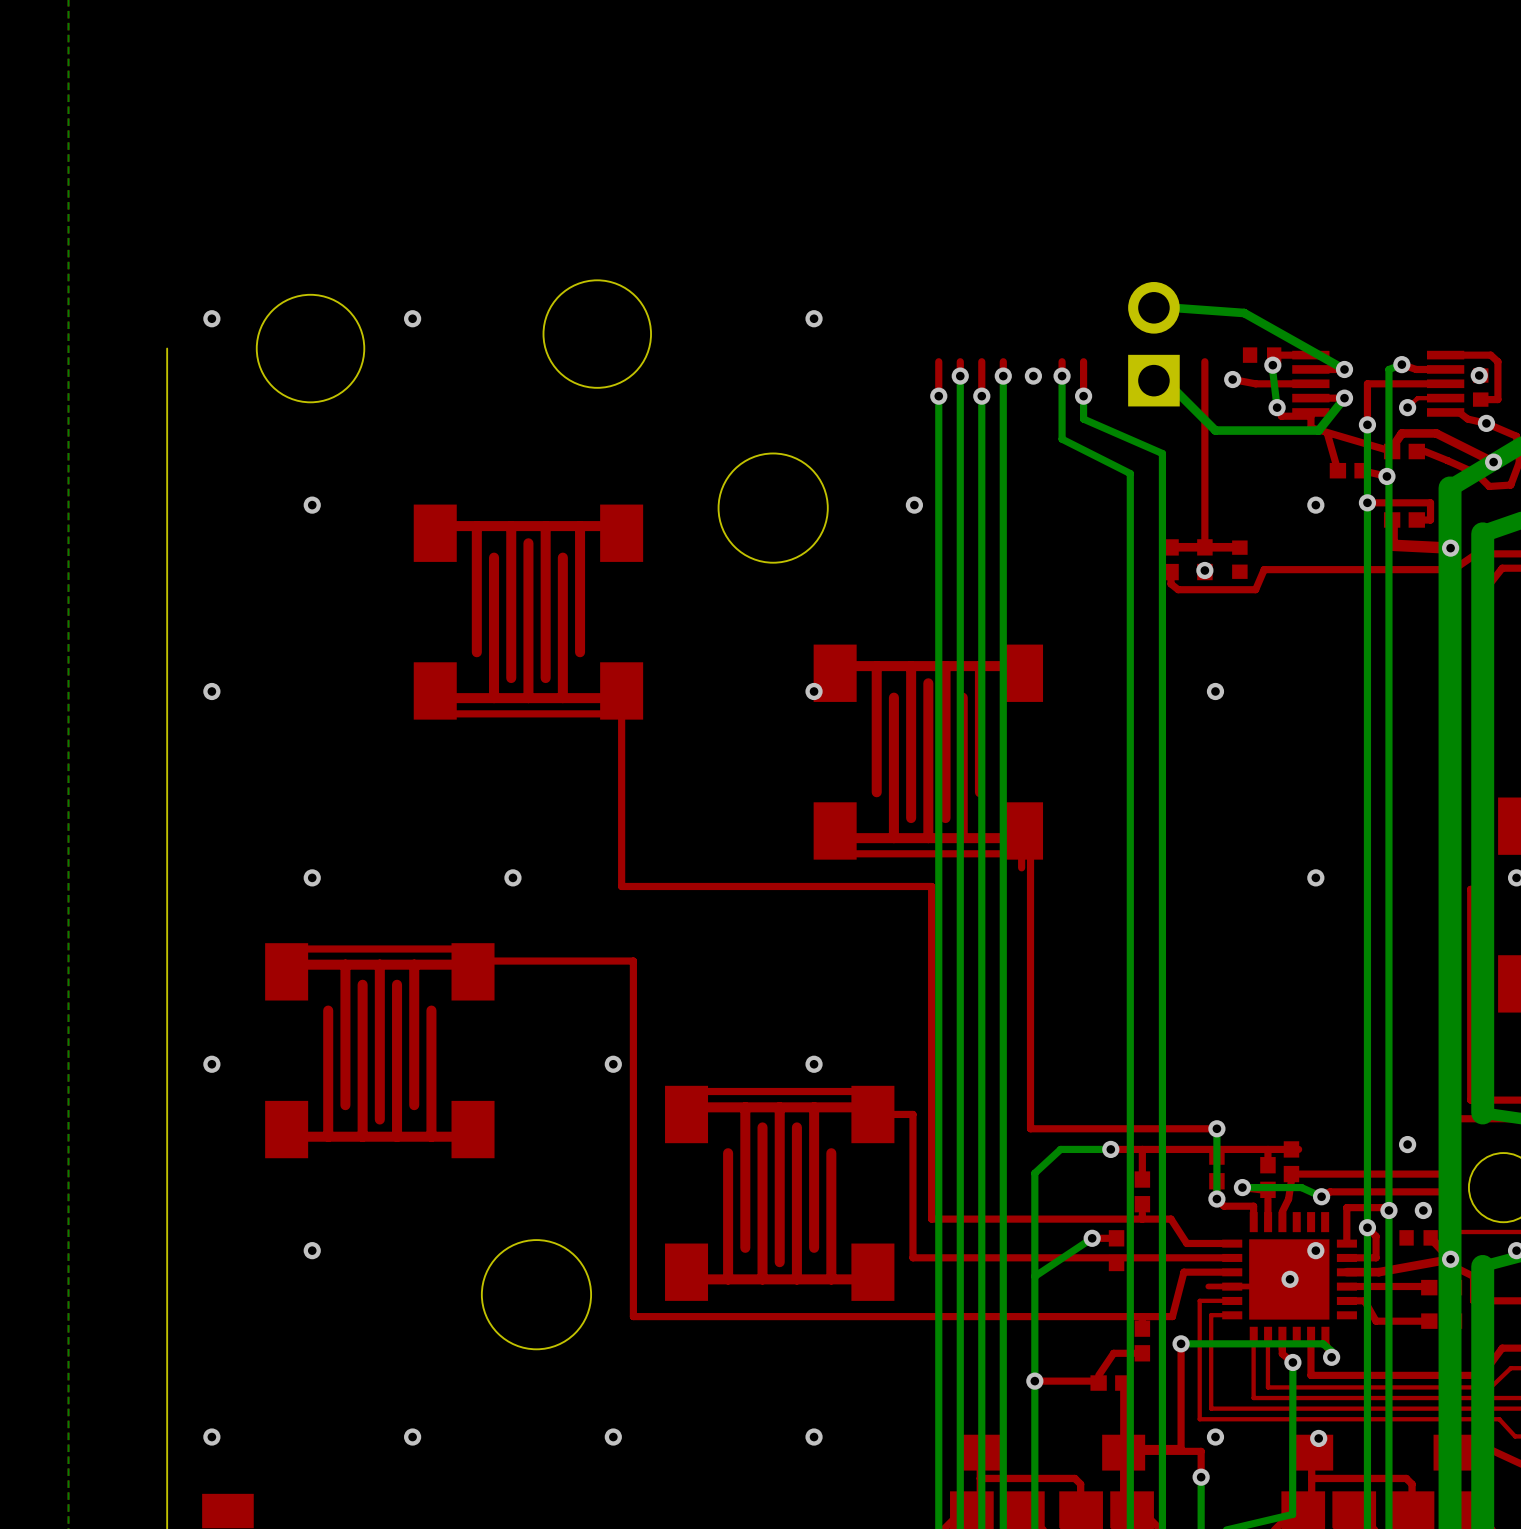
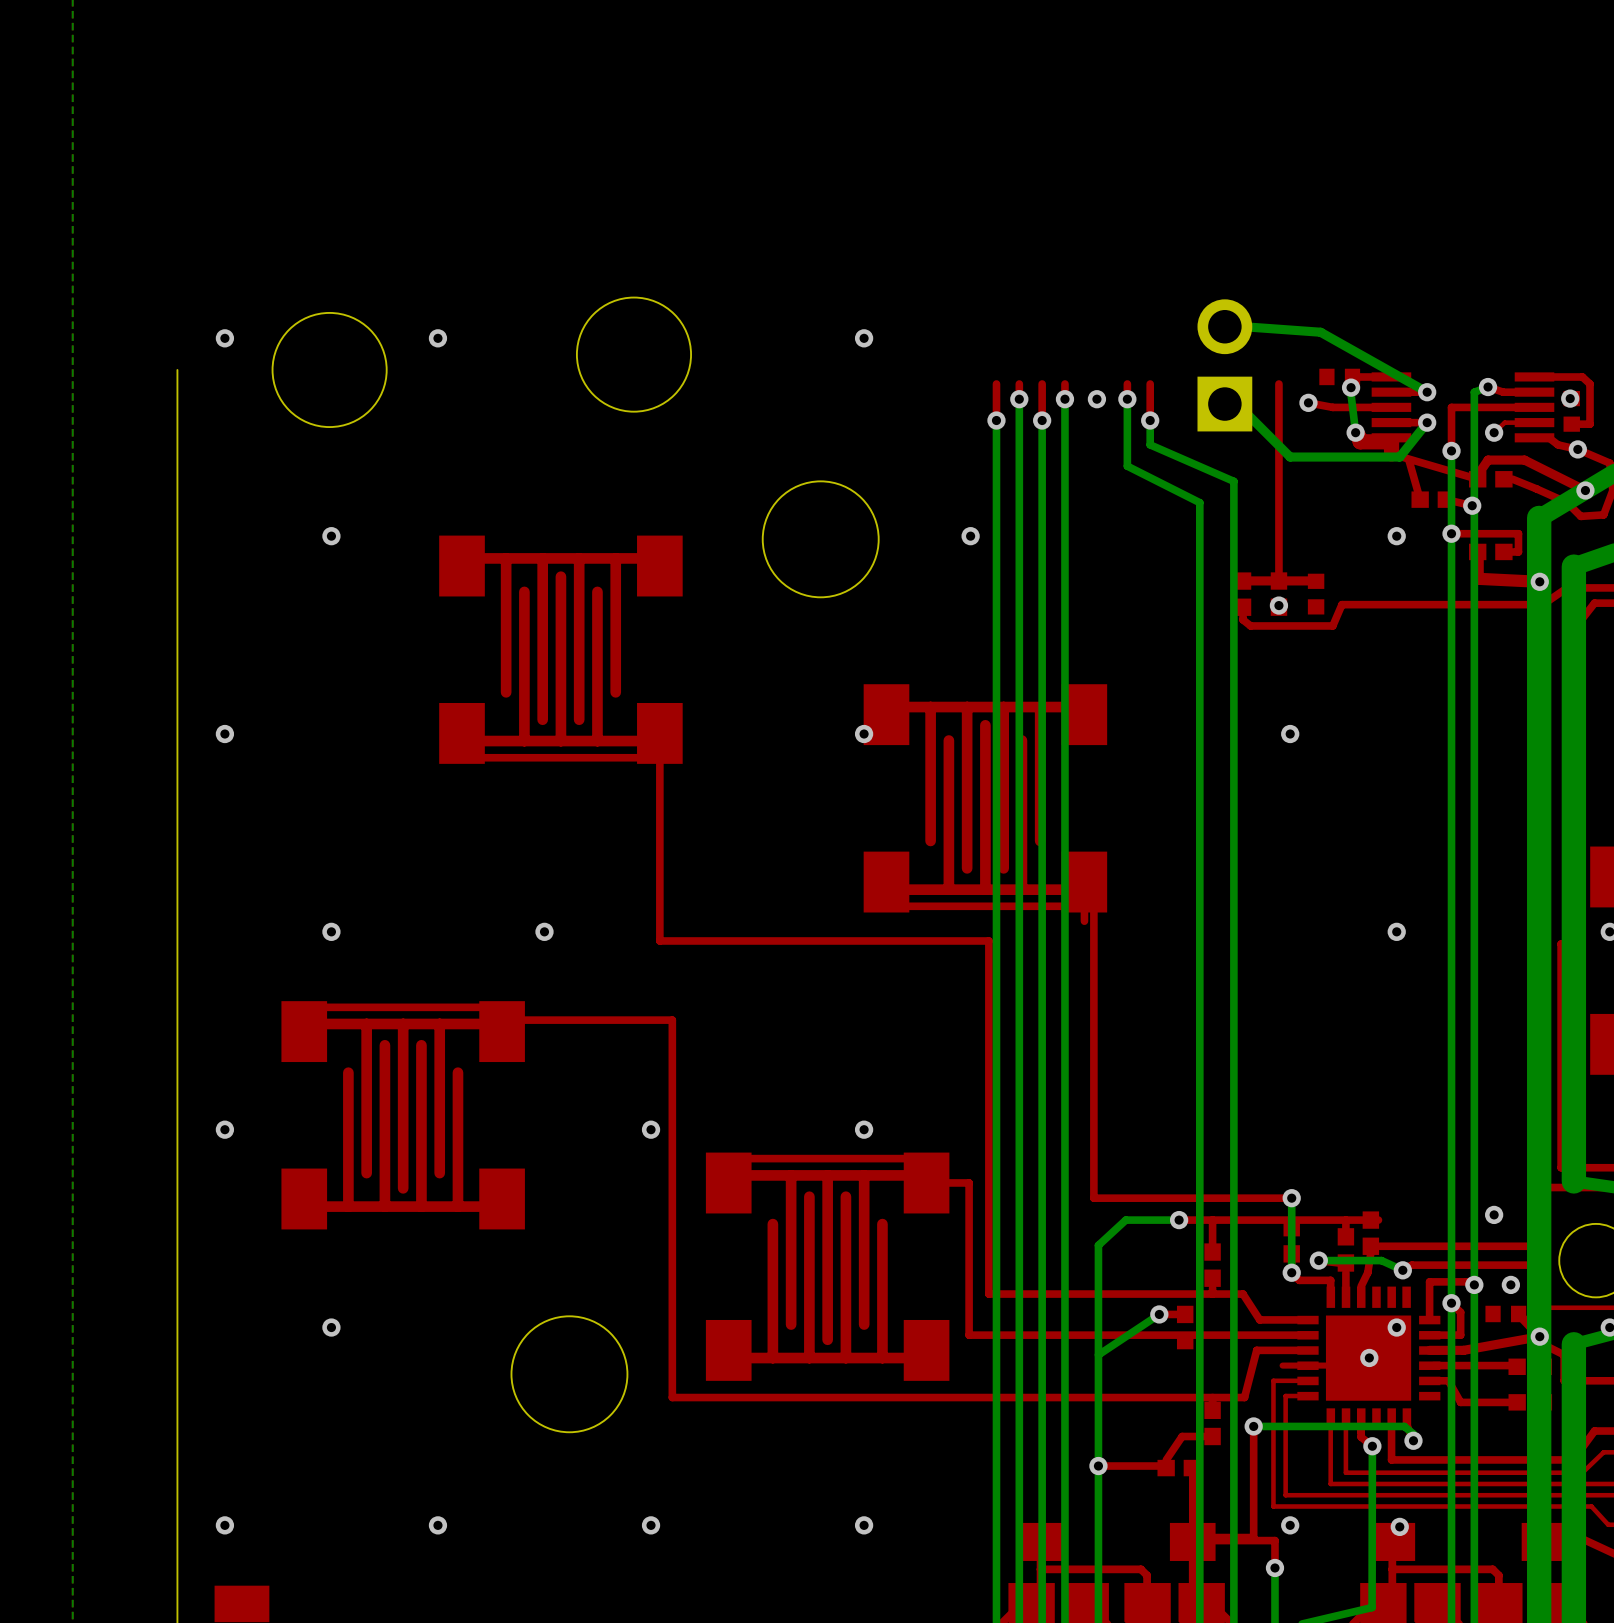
top track width: thin (1277, 407) (1281, 416) (1310, 416) (1310, 427) -> thick (1355, 432) (1360, 441) (1391, 441) (1391, 453)

